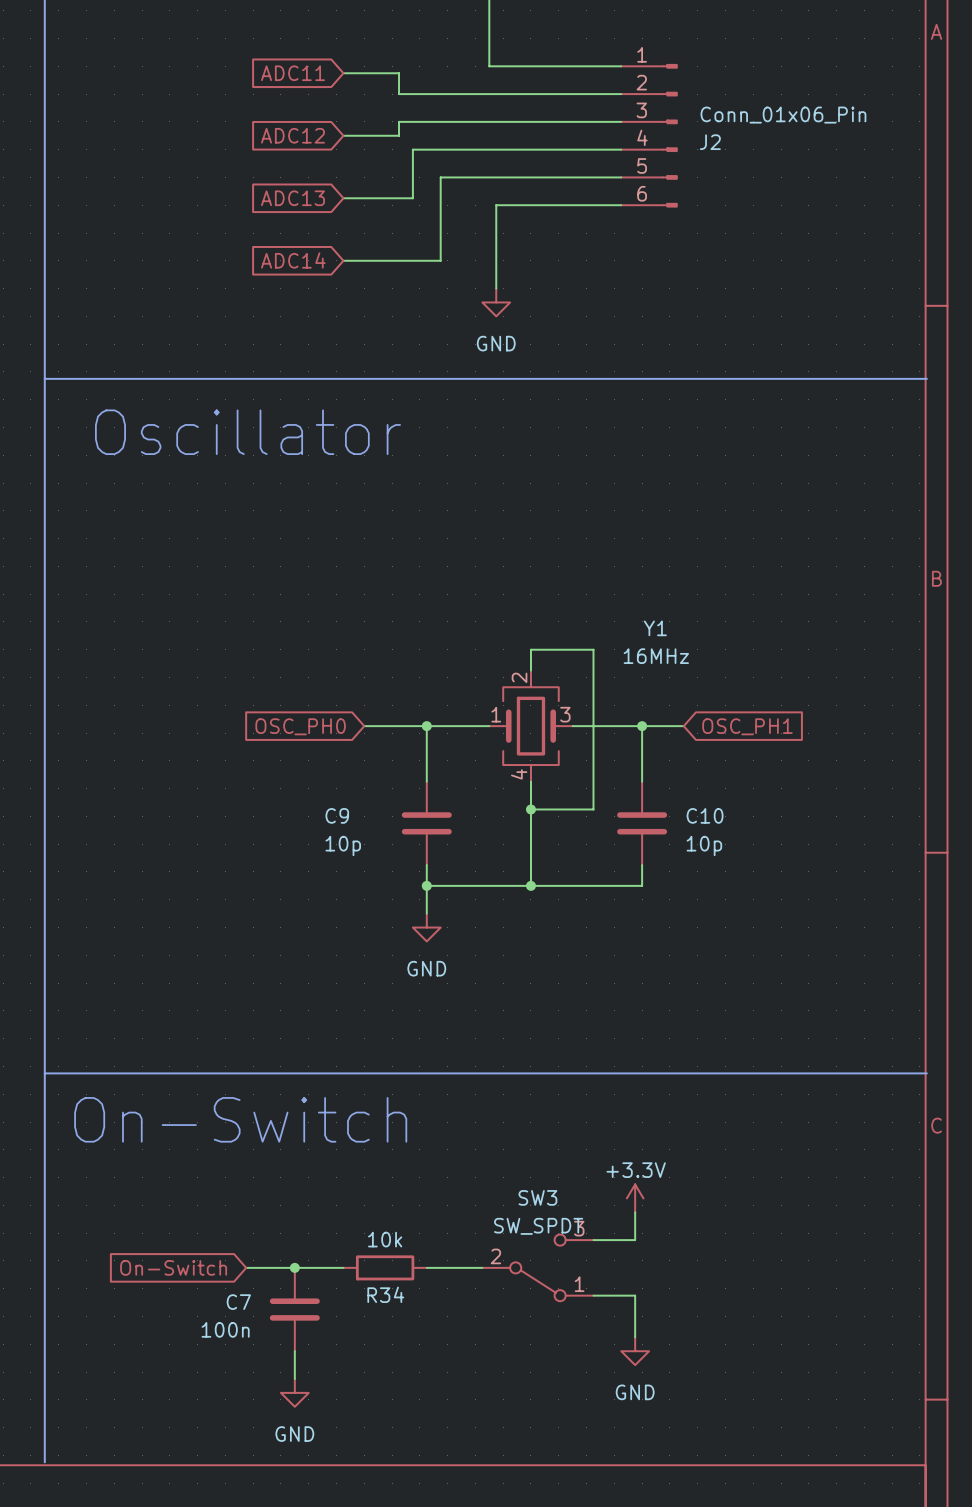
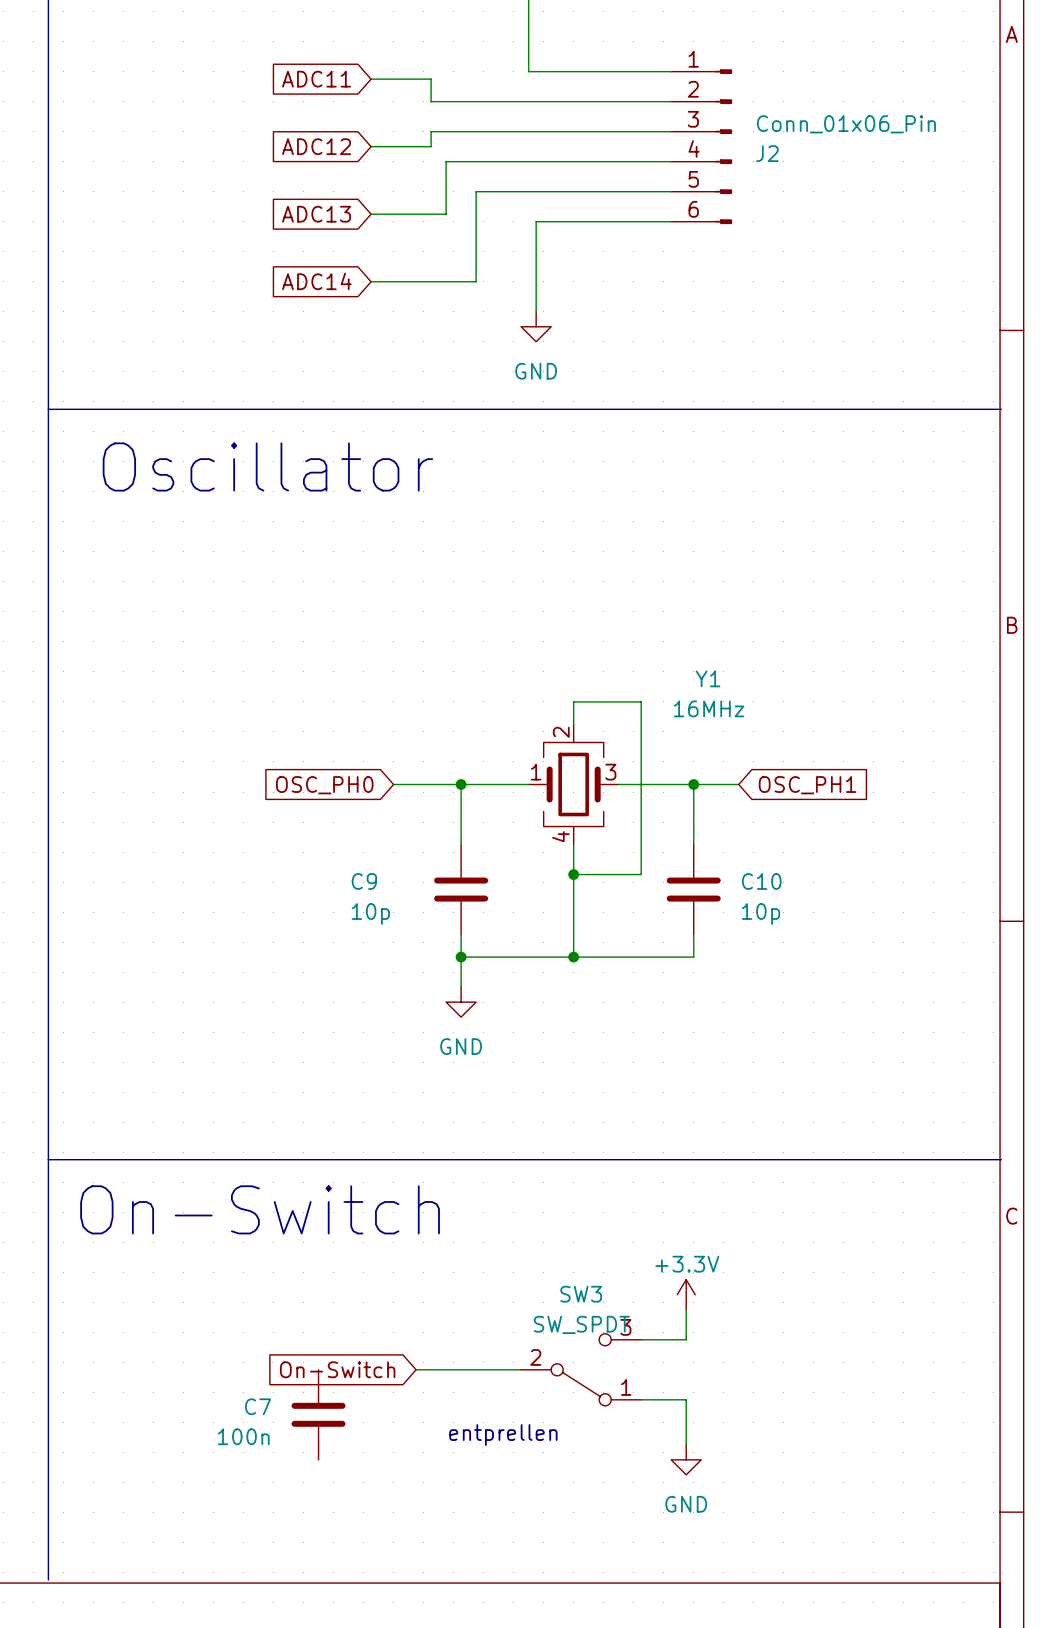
global label position: On-Switch (173, 1267) -> On-Switch (337, 1369)
wire: (246, 1267) (343, 1267) -> none
junction: (294, 1267) -> none
wire: none -> (416, 1369) (461, 1369)
R34: 10k (385, 1267) -> none
text: none -> entprellen (503, 1435)
wire: (294, 1351) (294, 1379) -> none
power symbol: GND (294, 1392) -> none

